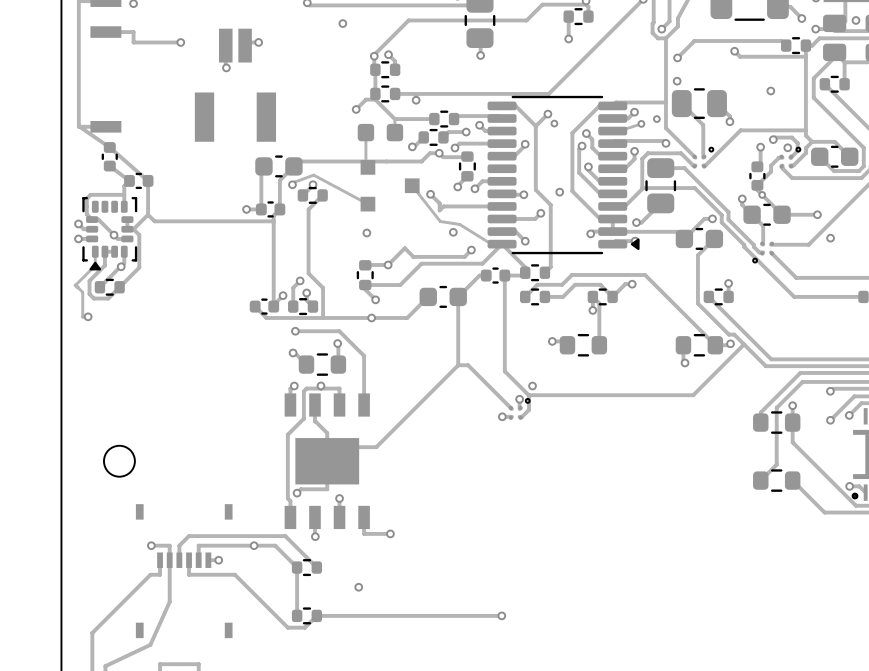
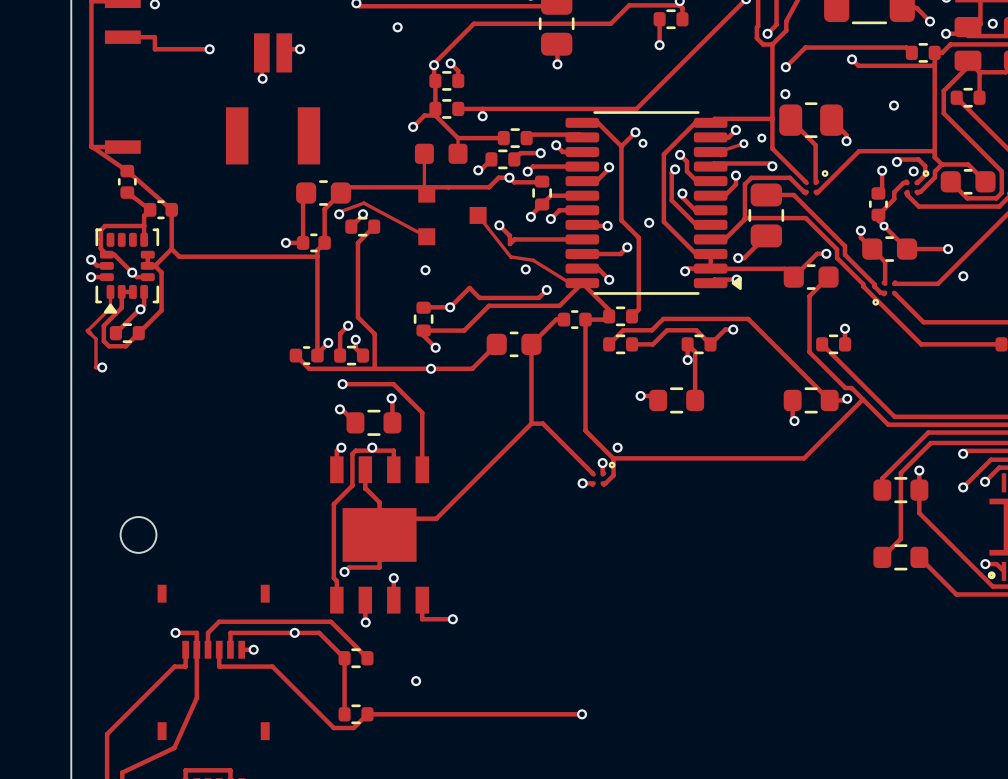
track: none -> (582, 195) (550, 195) (542, 204)

